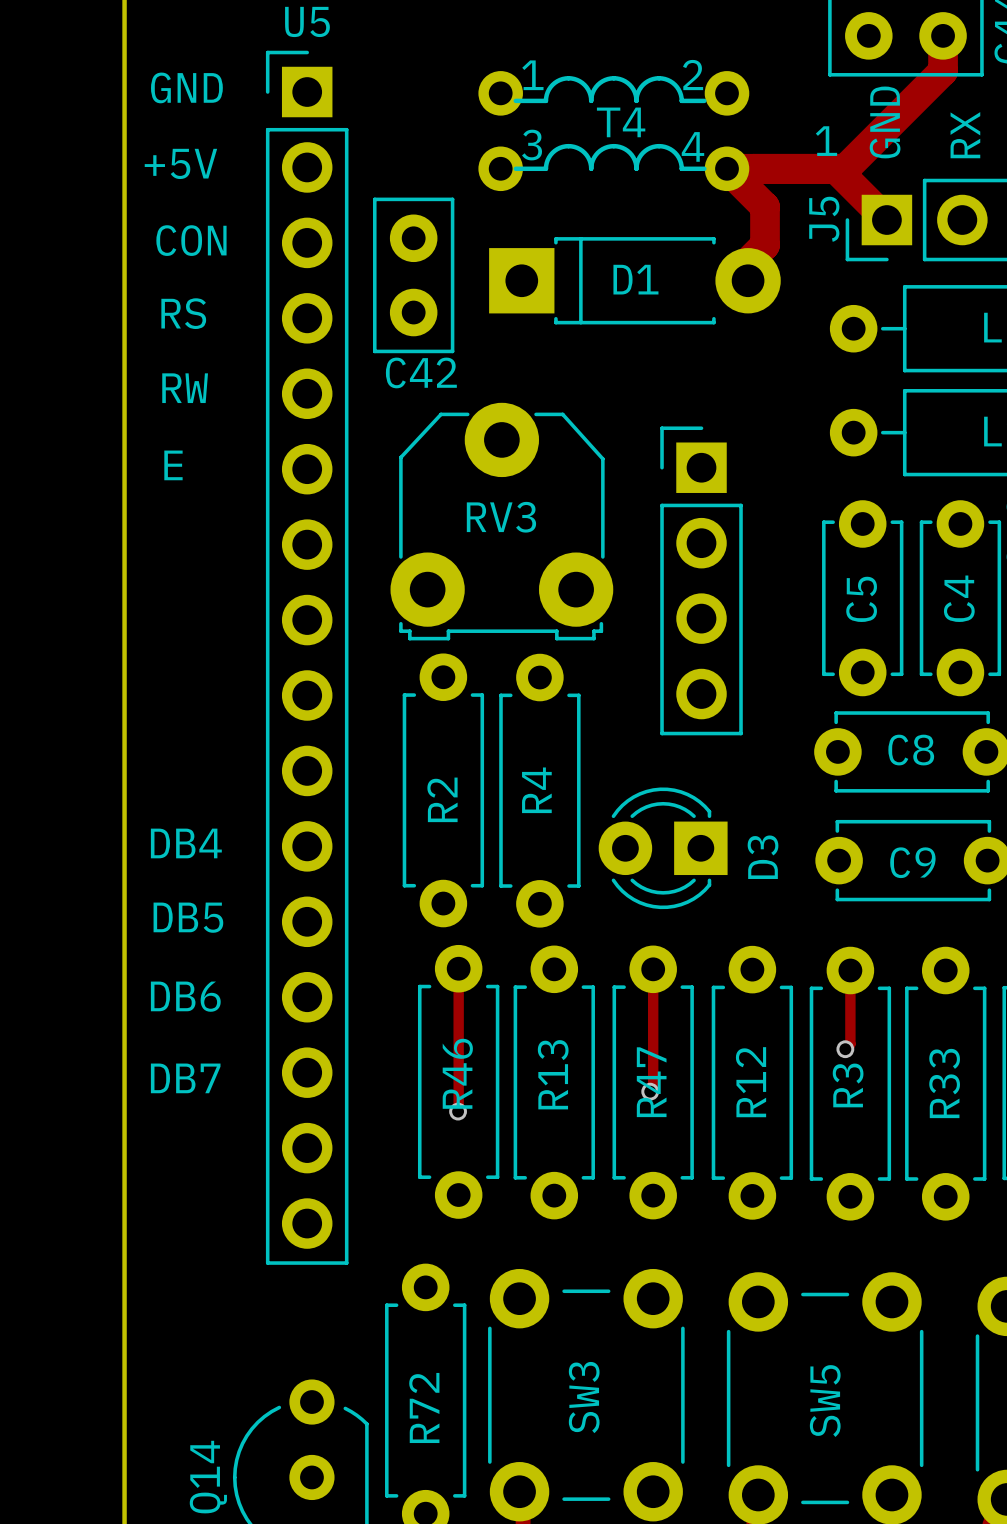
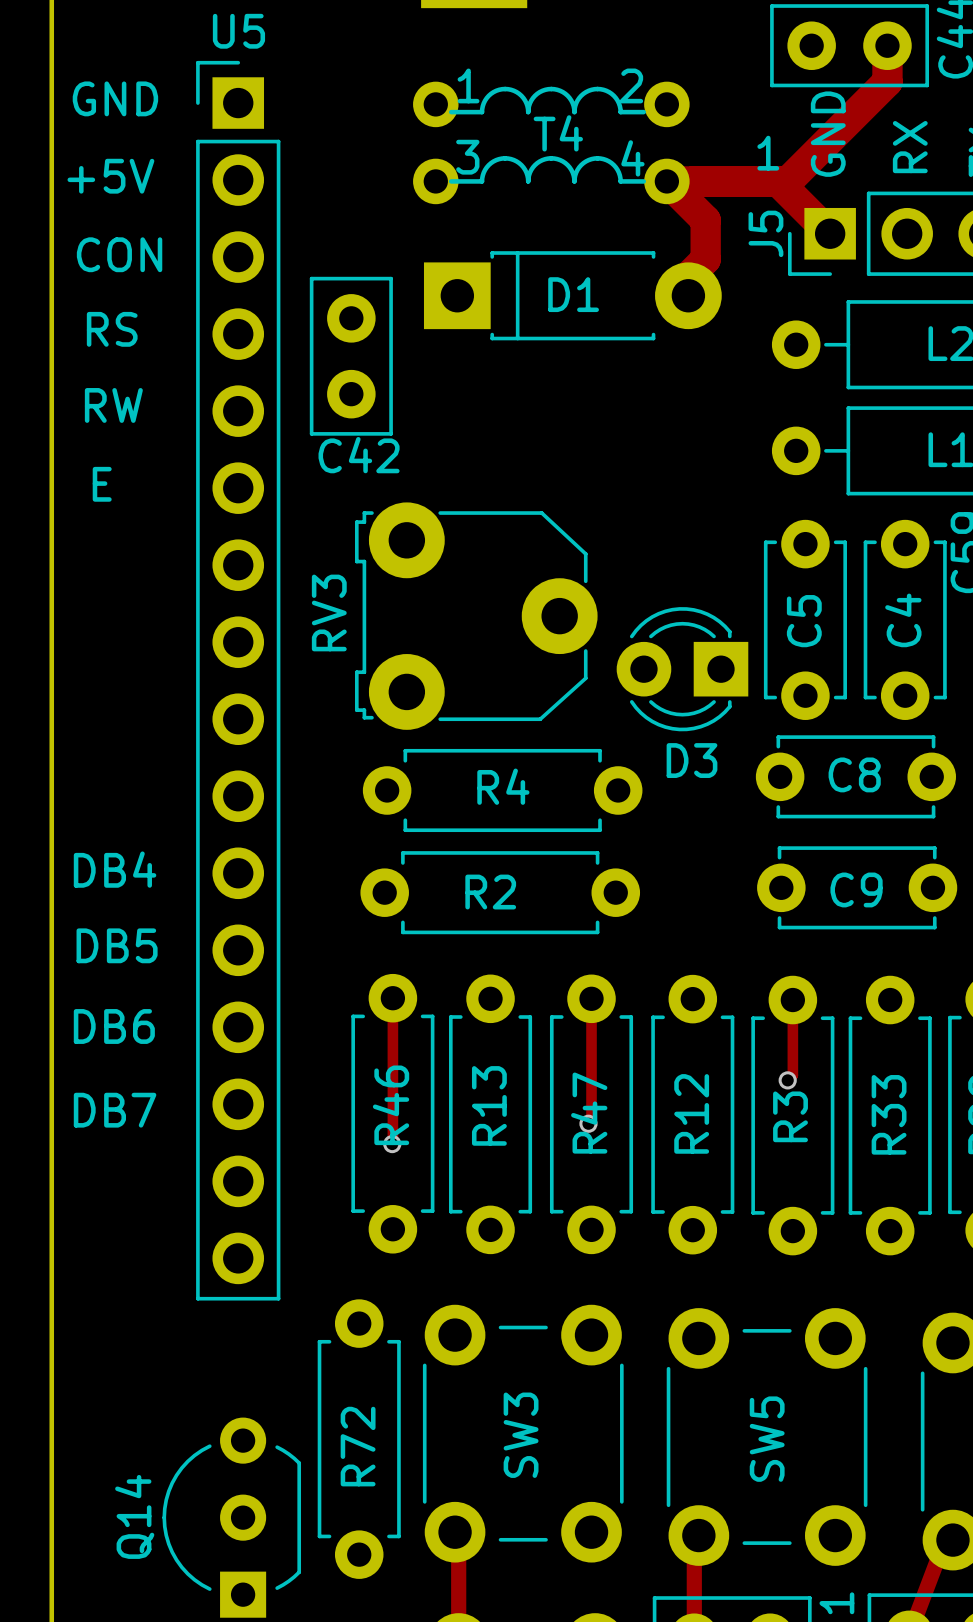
C42 position: (413, 275) -> (351, 356)
RV3 name position: RV3 (501, 517) -> RV3 (329, 612)
RV3 rotation: 0° (501, 521) -> 90° clockwise (476, 616)
part: (701, 580) -> none
D3 footprint: [598, 787, 728, 910] -> [616, 607, 749, 732]
R2 rotation: 0° (443, 790) -> 90° clockwise (500, 892)
R4 rotation: 0° (539, 790) -> 90° clockwise (502, 790)
D3 name position: D3 (763, 857) -> D3 (692, 760)

